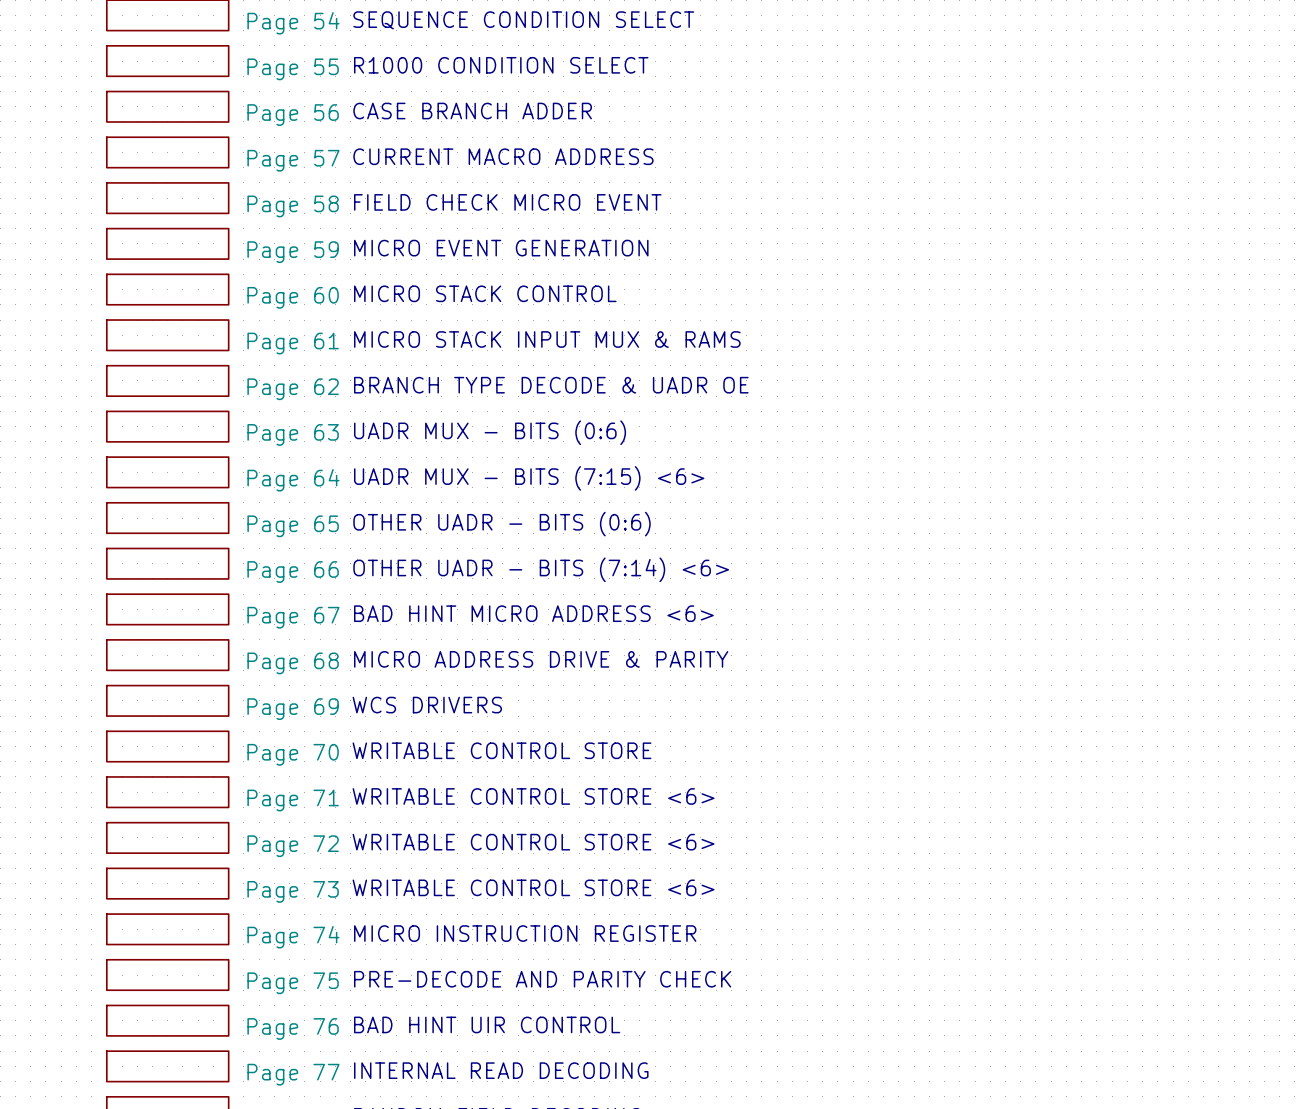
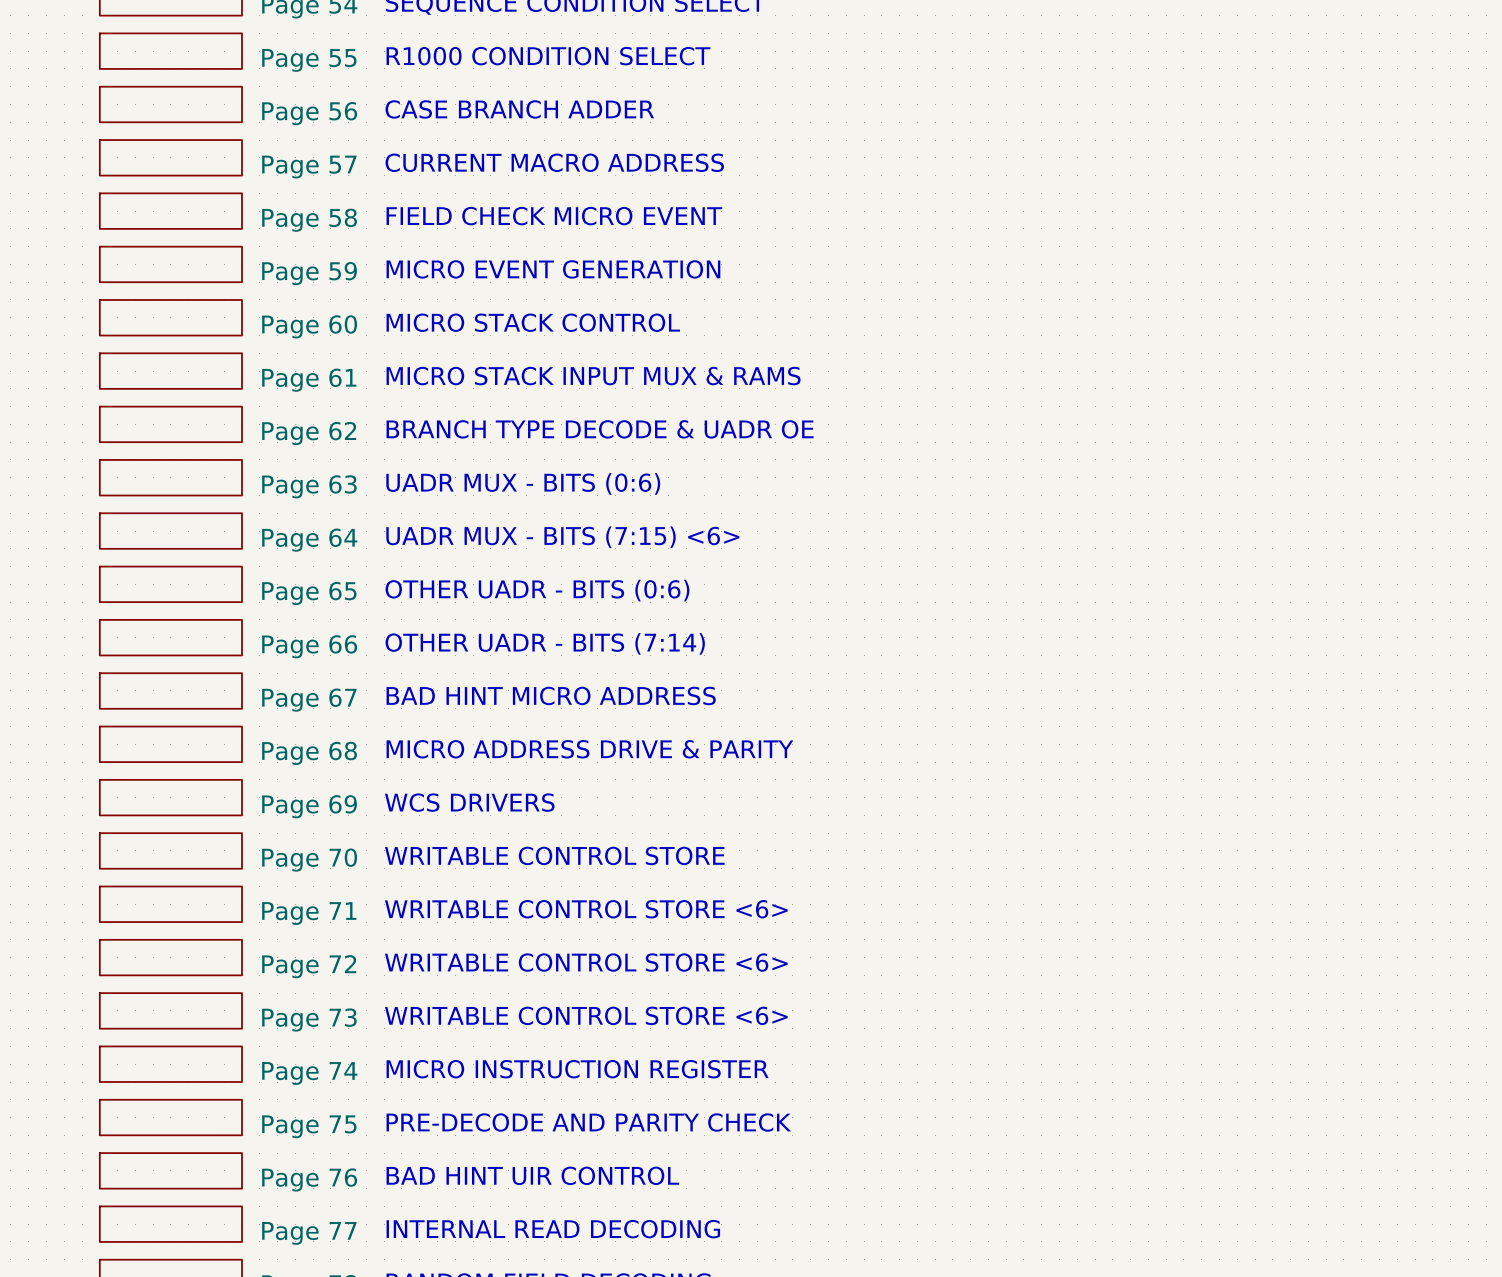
text: OTHER UADR - BITS (7:14) <6> (541, 569) -> OTHER UADR - BITS (7:14) (545, 643)
text: BAD HINT MICRO ADDRESS <6> (533, 613) -> BAD HINT MICRO ADDRESS (551, 695)

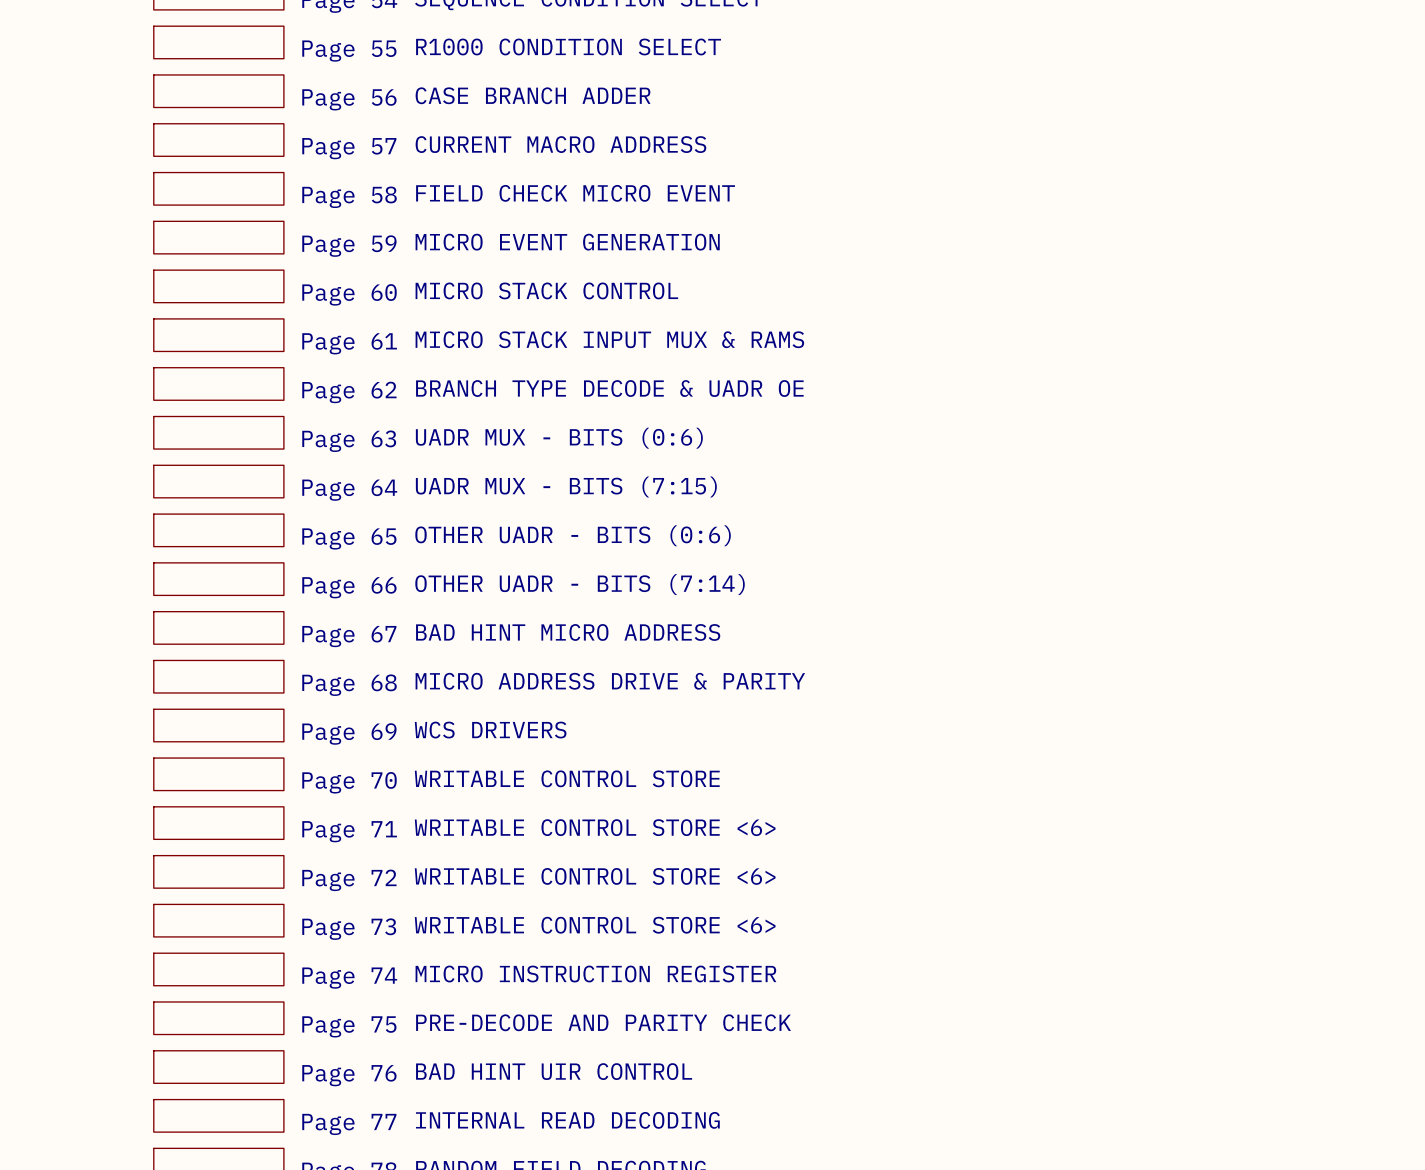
text: UADR MUX - BITS (7:15) <6> (562, 537) -> UADR MUX - BITS (7:15) (566, 486)

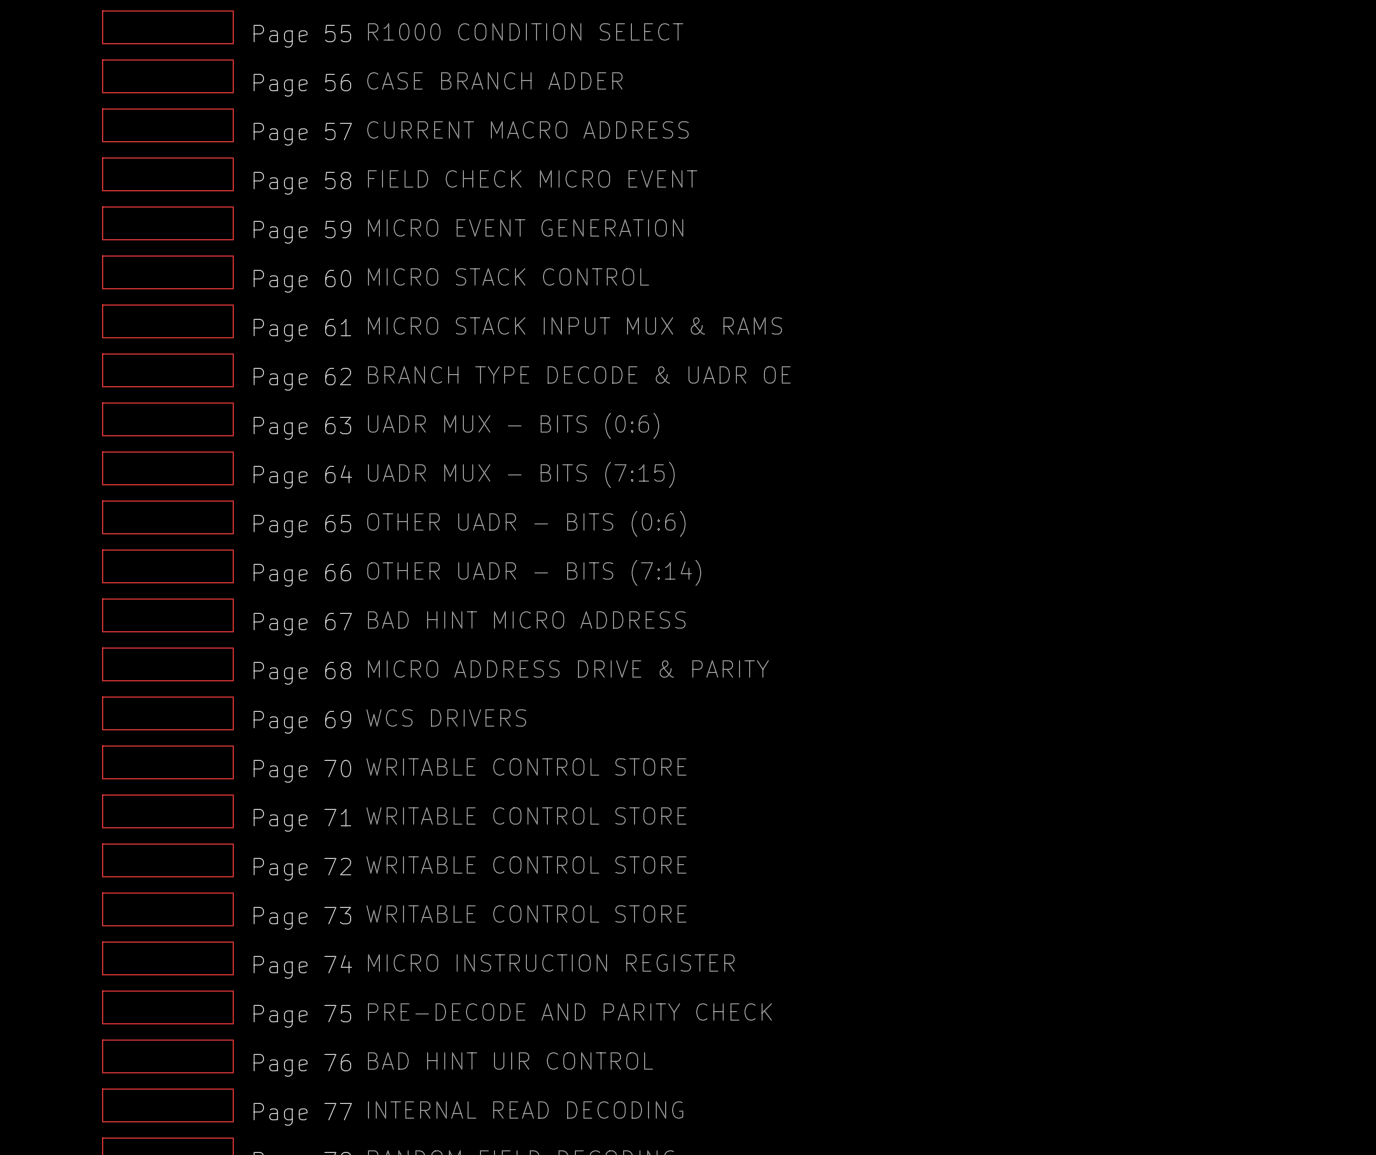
text: WRITABLE CONTROL STORE <6> (595, 827) -> WRITABLE CONTROL STORE (526, 815)
text: WRITABLE CONTROL STORE <6> (595, 876) -> WRITABLE CONTROL STORE (526, 864)
text: WRITABLE CONTROL STORE <6> (595, 925) -> WRITABLE CONTROL STORE (526, 913)

